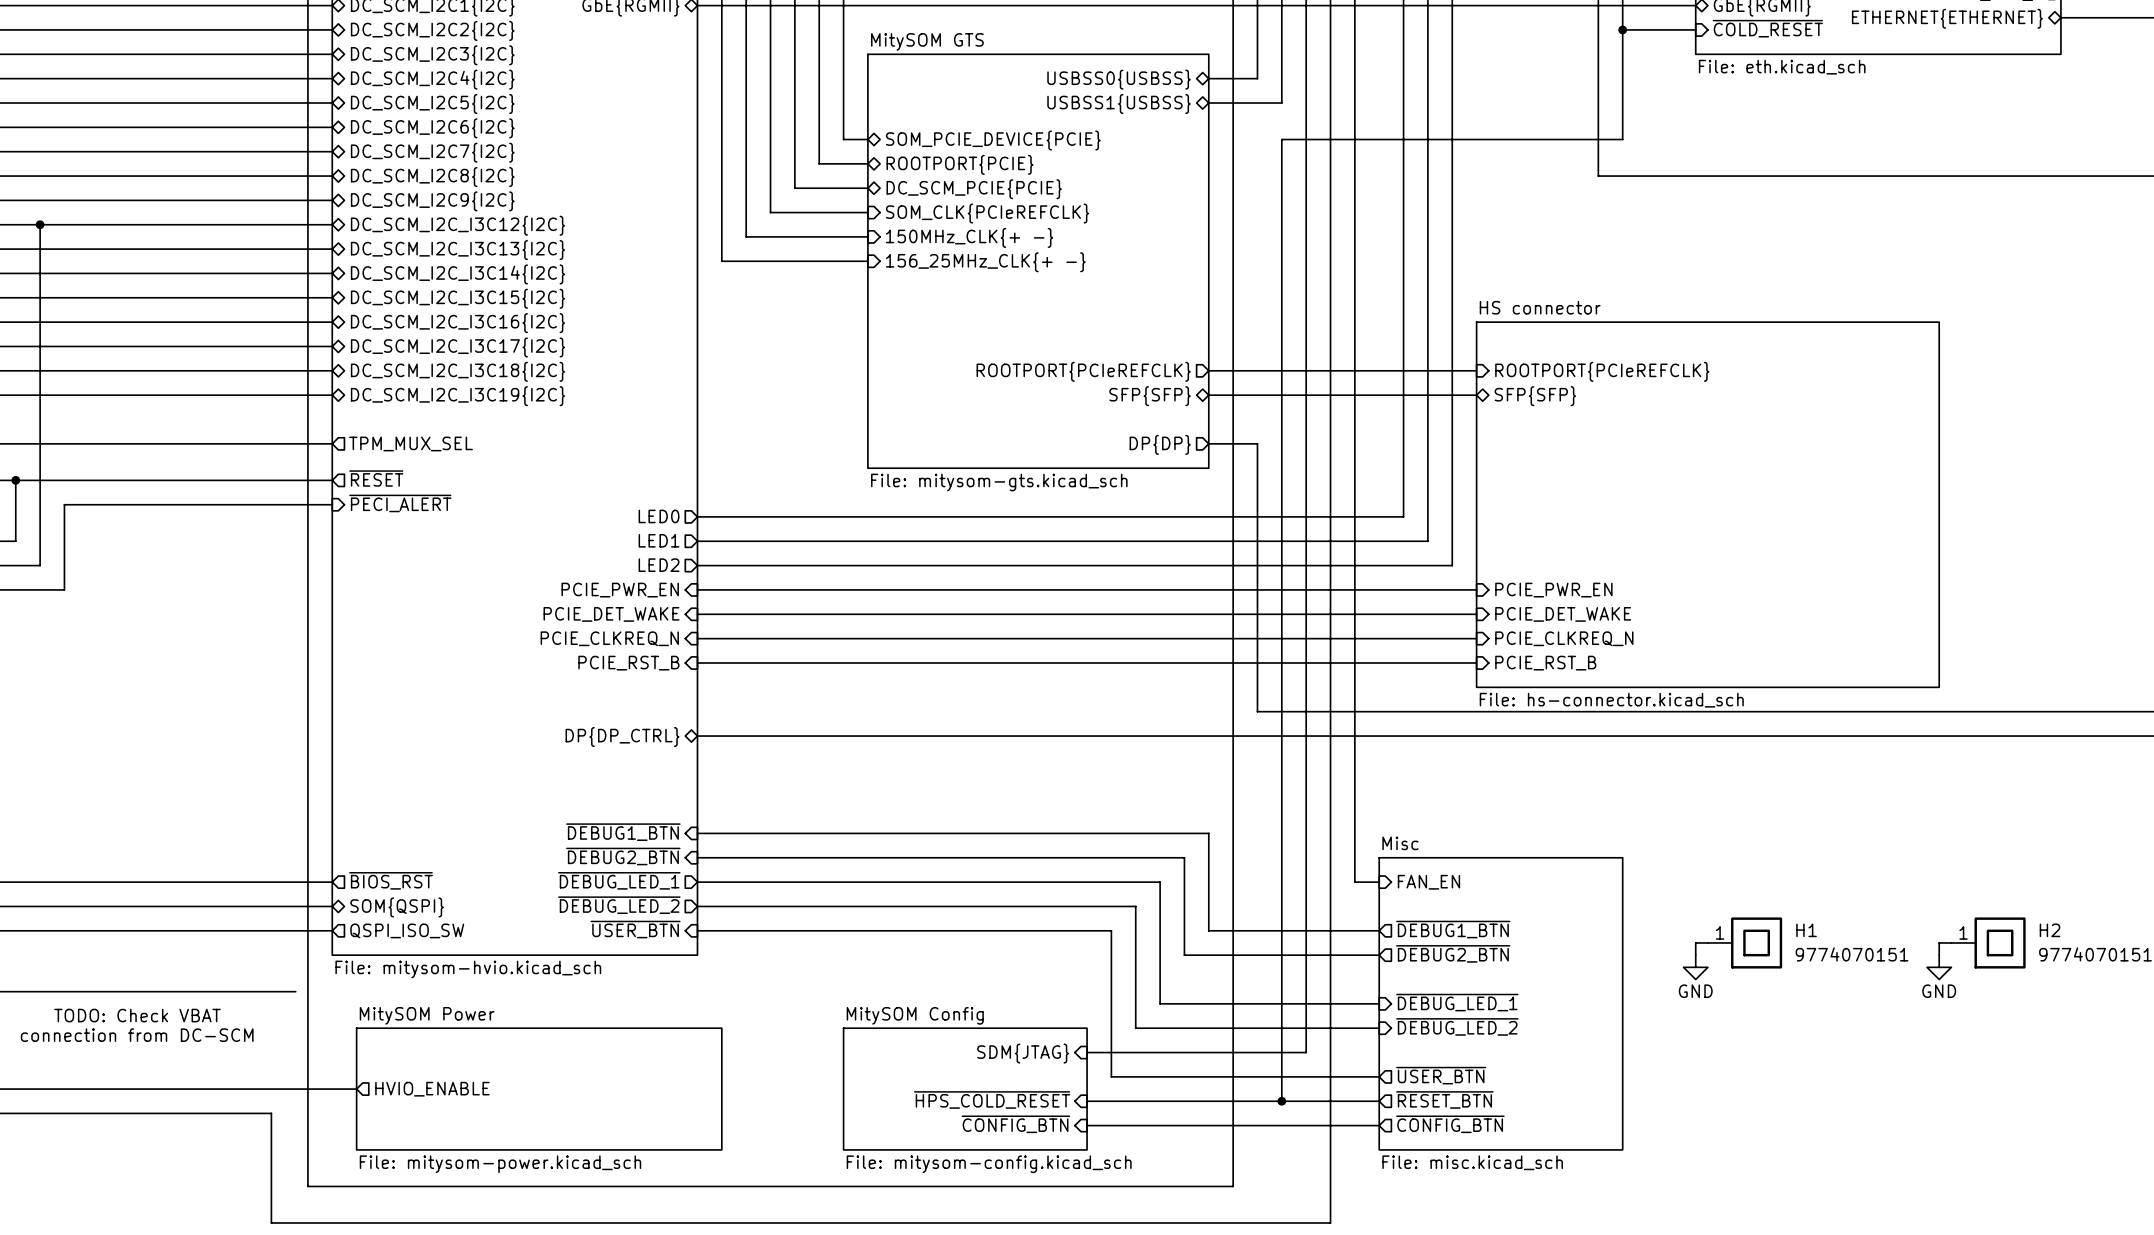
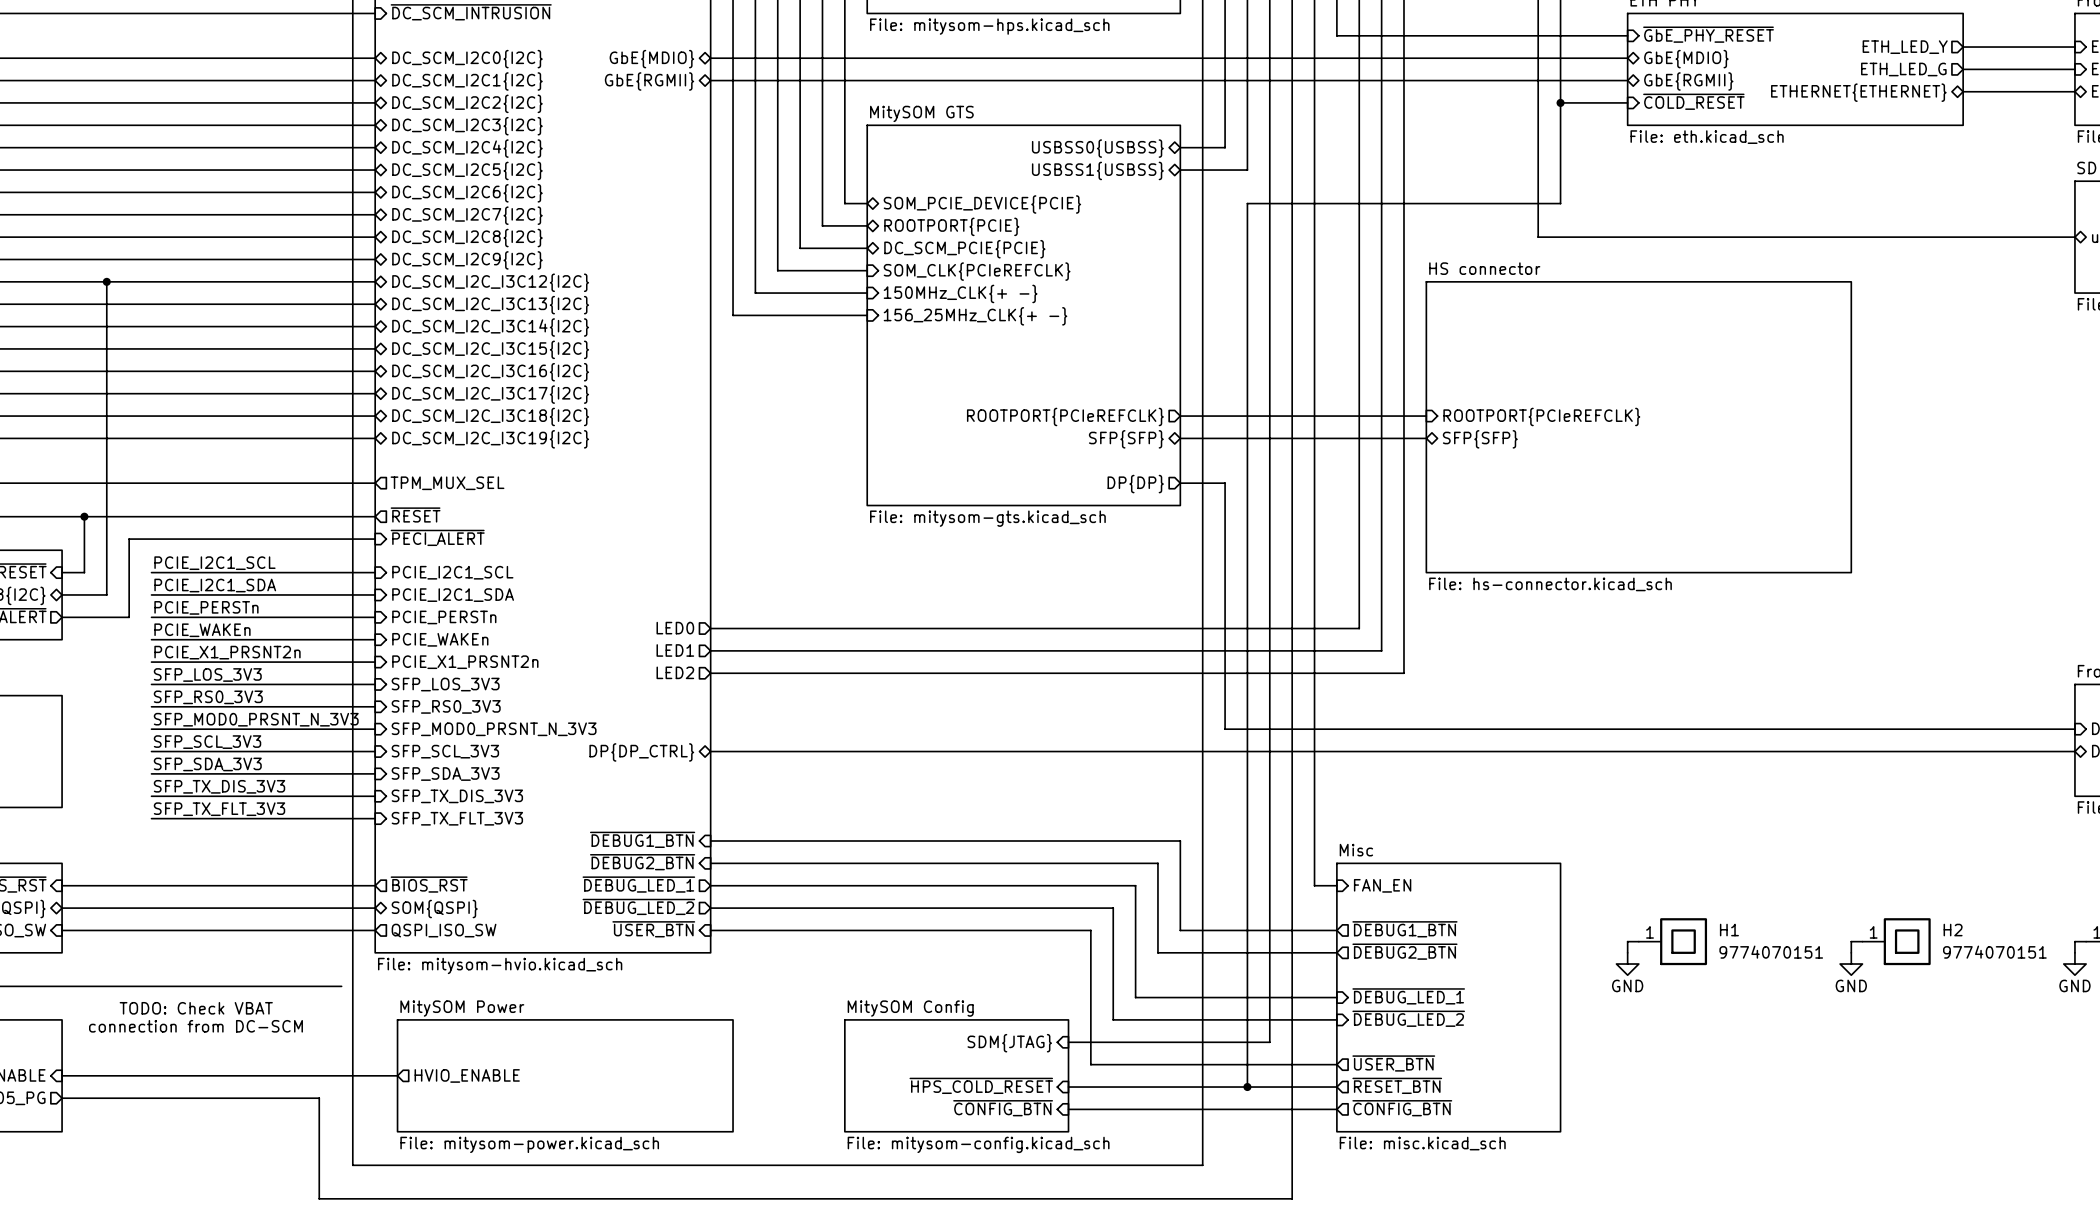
sheet HS connector: none -> File: hs-connector.kicad_sch (1638, 427)
sheet HS connector: File: hs-connector.kicad_sch (1707, 504) -> none
sheet pin position: LED0 (659, 516) -> LED0 (675, 628)
wire: (697, 516) (1403, 516) -> (710, 628) (1359, 628) (1359, 550)
label: none -> PCIE_I2C1_SCL (214, 563)
sheet pin position: LED1 (659, 540) -> LED1 (675, 650)
wire: none -> (151, 572) (375, 572)
sheet pin: none -> PCIE_I2C1_SCL (452, 572)
wire: (697, 541) (1427, 541) -> (710, 650) (1381, 650) (1381, 572)
label: none -> PCIE_I2C1_SDA (215, 585)
wire: none -> (151, 594) (375, 594)
sheet pin: none -> PCIE_I2C1_SDA (453, 595)
sheet pin position: LED2 (659, 565) -> LED2 (675, 672)
wire: (697, 565) (1452, 565) -> (710, 673) (1403, 673) (1403, 594)
label: none -> PCIE_PERSTn (206, 607)
wire: none -> (151, 617) (375, 617)
wire: (697, 589) (1476, 589) -> none
sheet pin: none -> PCIE_PERSTn (444, 617)
sheet pin: PCIE_PWR_EN (620, 590) -> none
sheet pin: PCIE_PWR_EN (1553, 590) -> none
label: none -> PCIE_WAKEn (202, 630)
wire: none -> (151, 639) (375, 639)
sheet pin: none -> PCIE_WAKEn (440, 639)
sheet pin: PCIE_DET_WAKE (611, 614) -> none
wire: (697, 614) (1476, 614) -> none
sheet pin: PCIE_DET_WAKE (1563, 614) -> none
label: none -> PCIE_X1_PRSNT2n (227, 652)
wire: none -> (151, 662) (375, 662)
sheet pin: none -> PCIE_X1_PRSNT2n (465, 662)
sheet pin: PCIE_CLKREQ_N (609, 638) -> none
wire: (697, 638) (1476, 638) -> none
sheet pin: PCIE_CLKREQ_N (1564, 638) -> none
label: none -> SFP_LOS_3V3 (207, 674)
wire: none -> (151, 684) (375, 684)
wire: (697, 662) (1476, 662) -> none
sheet pin: none -> SFP_LOS_3V3 (445, 684)
sheet pin: PCIE_RST_B (628, 663) -> none
sheet pin: PCIE_RST_B (1545, 663) -> none
label: none -> SFP_RS0_3V3 (208, 697)
wire: none -> (151, 706) (375, 706)
sheet pin: none -> SFP_RS0_3V3 (446, 706)
label: none -> SFP_MOD0_PRSNT_N_3V3 (256, 719)
wire: none -> (151, 729) (375, 729)
sheet pin: none -> SFP_MOD0_PRSNT_N_3V3 (494, 729)
label: none -> SFP_SCL_3V3 (207, 742)
wire: none -> (151, 751) (375, 751)
sheet pin: none -> SFP_SCL_3V3 (445, 751)
label: none -> SFP_SDA_3V3 (207, 764)
wire: none -> (151, 773) (375, 773)
sheet pin: none -> SFP_SDA_3V3 (445, 774)
label: none -> SFP_TX_DIS_3V3 (219, 786)
wire: none -> (151, 796) (375, 796)
sheet pin: none -> SFP_TX_DIS_3V3 (457, 796)
label: none -> SFP_TX_FLT_3V3 (219, 809)
wire: none -> (151, 818) (375, 818)
sheet pin: none -> SFP_TX_FLT_3V3 (457, 818)

